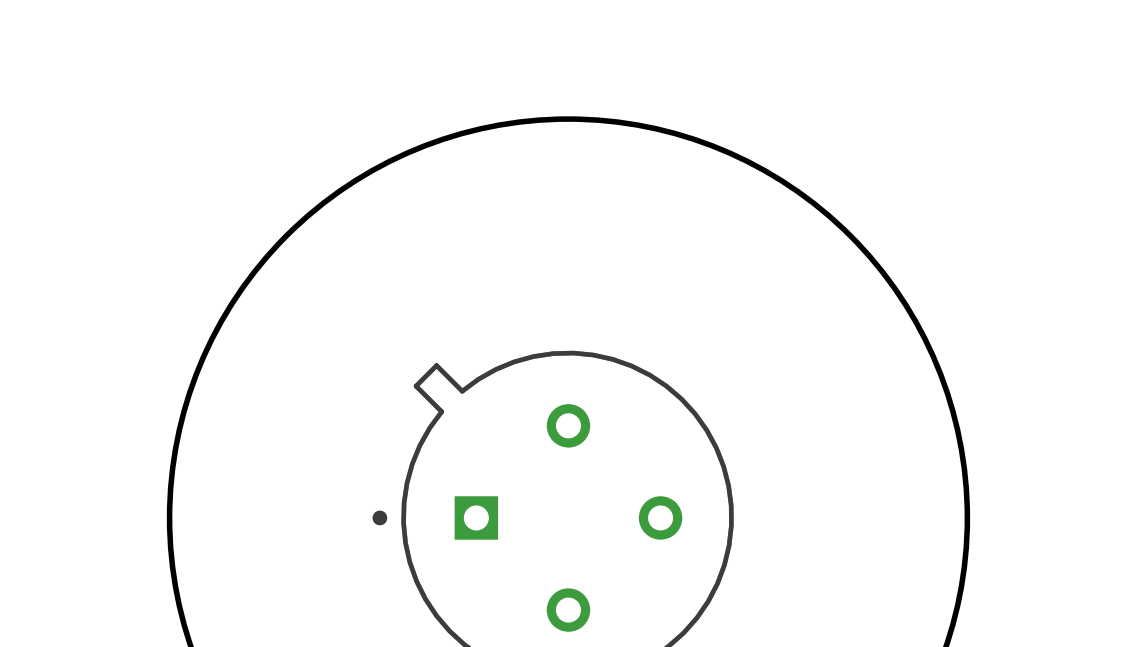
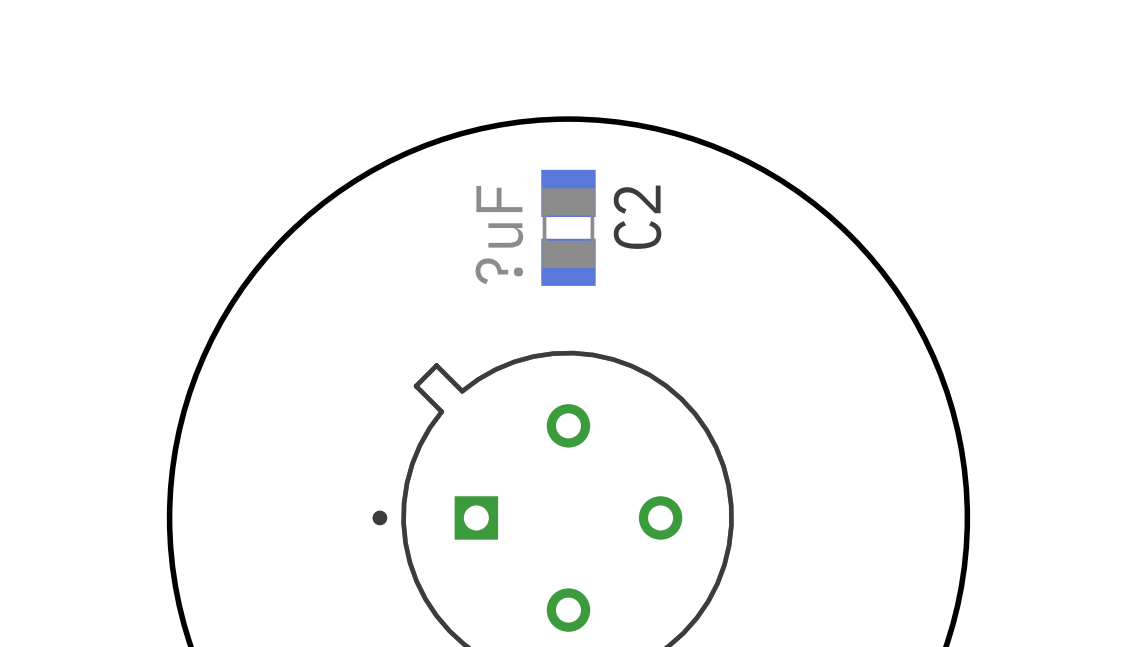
C2: none -> ?uF (568, 227)

